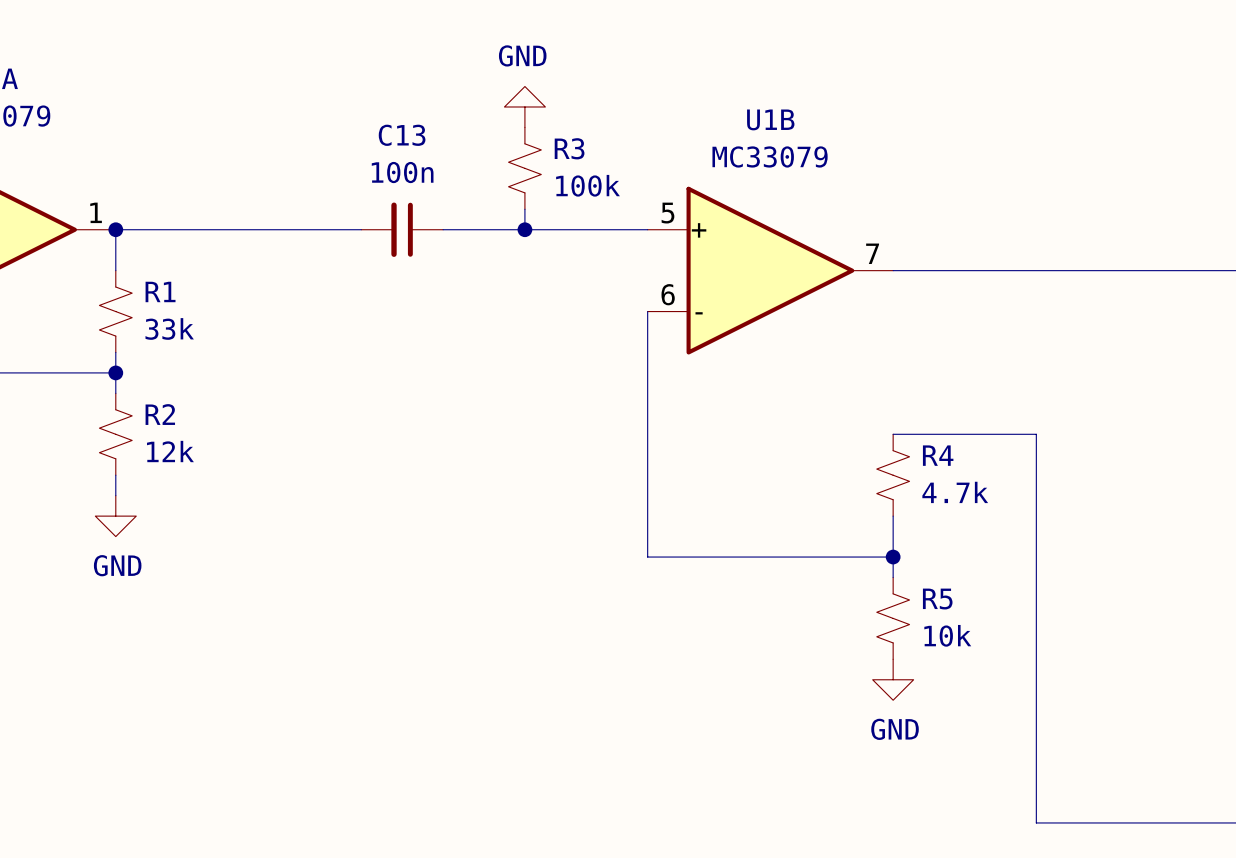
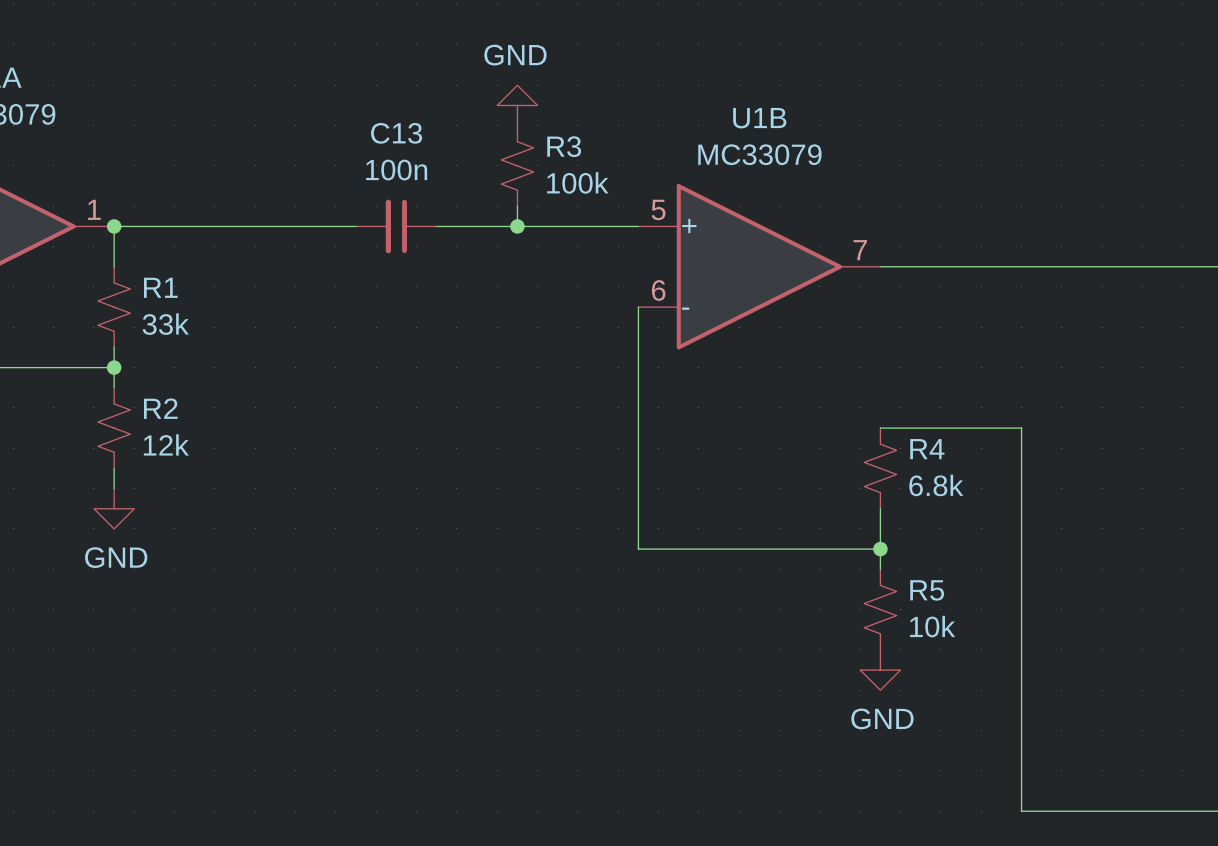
R4 value: 4.7k (955, 492) -> 6.8k (936, 485)

